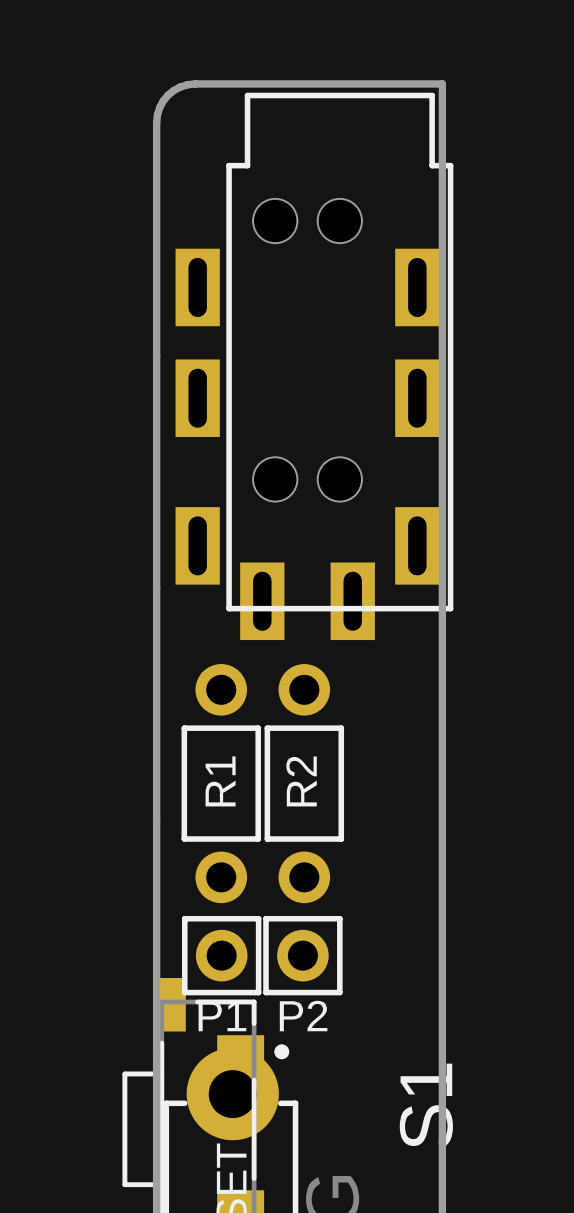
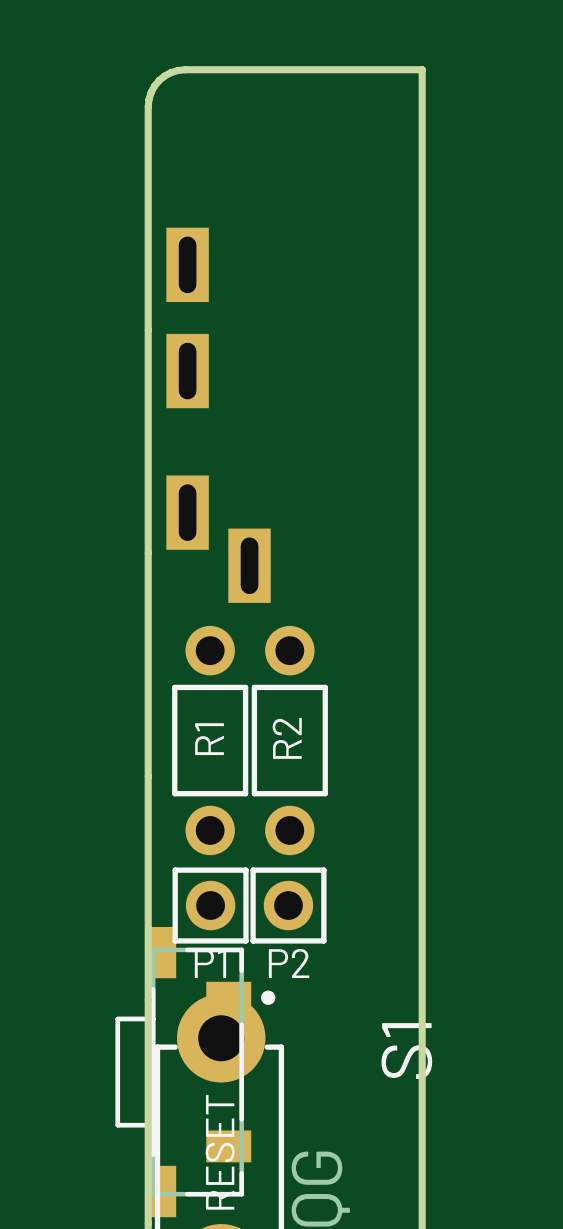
part: (314, 366) -> none
part: none -> (218, 415)

